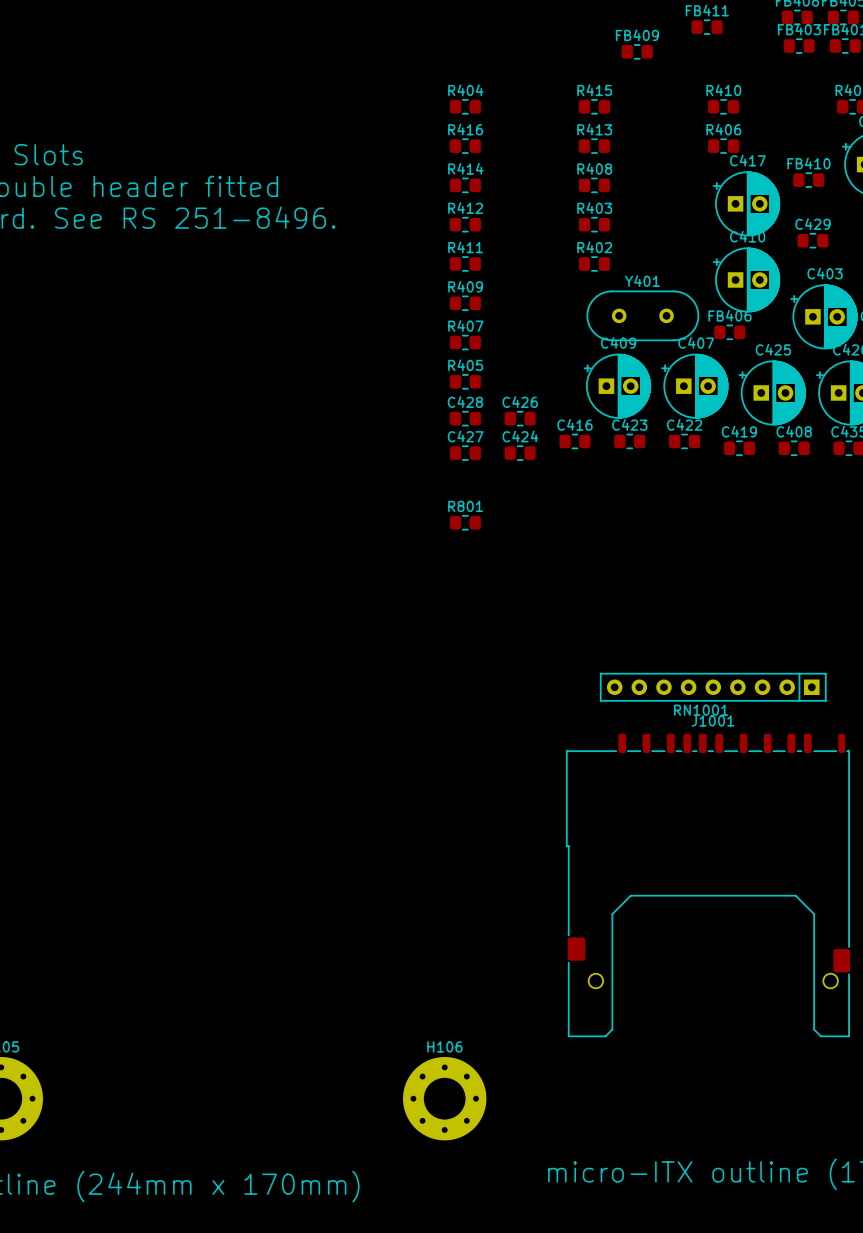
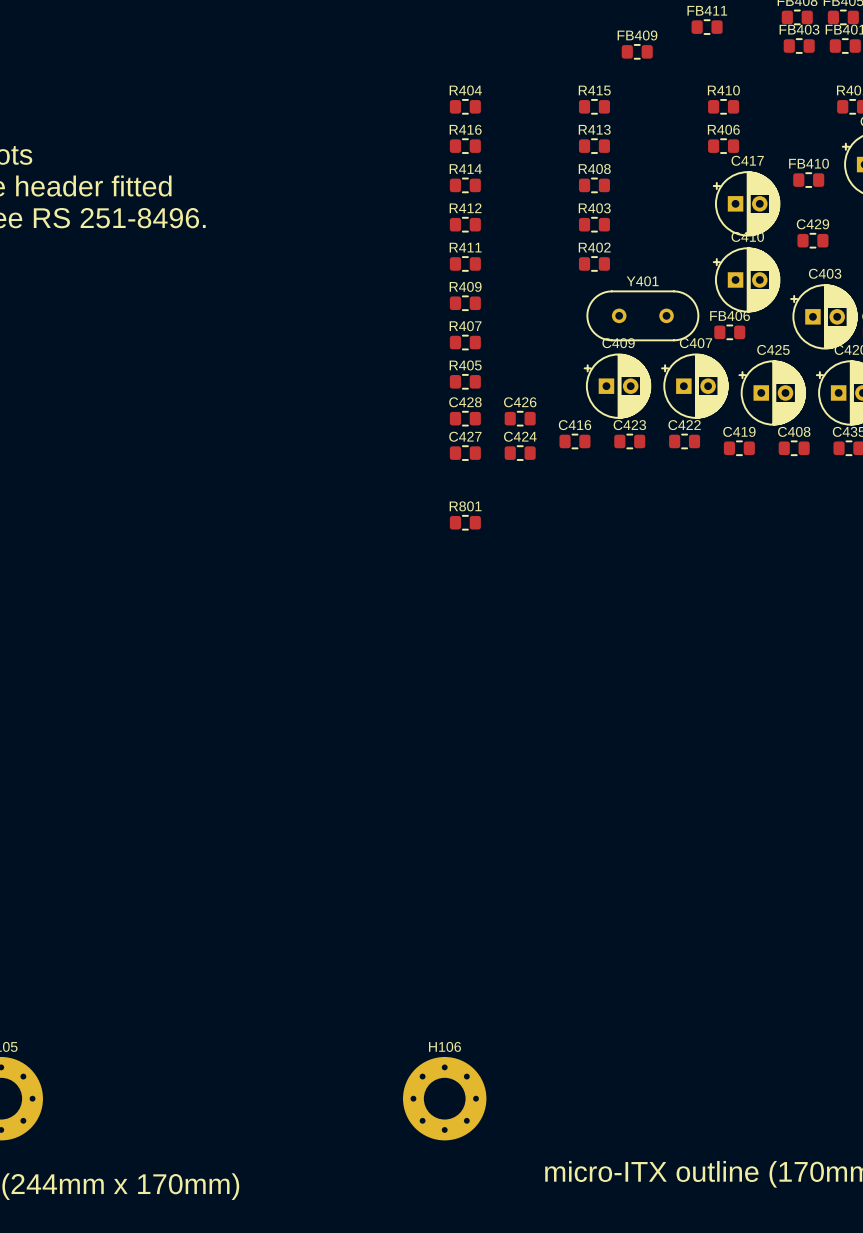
RN1001: (713, 687) -> none
J1001: (708, 885) -> none

